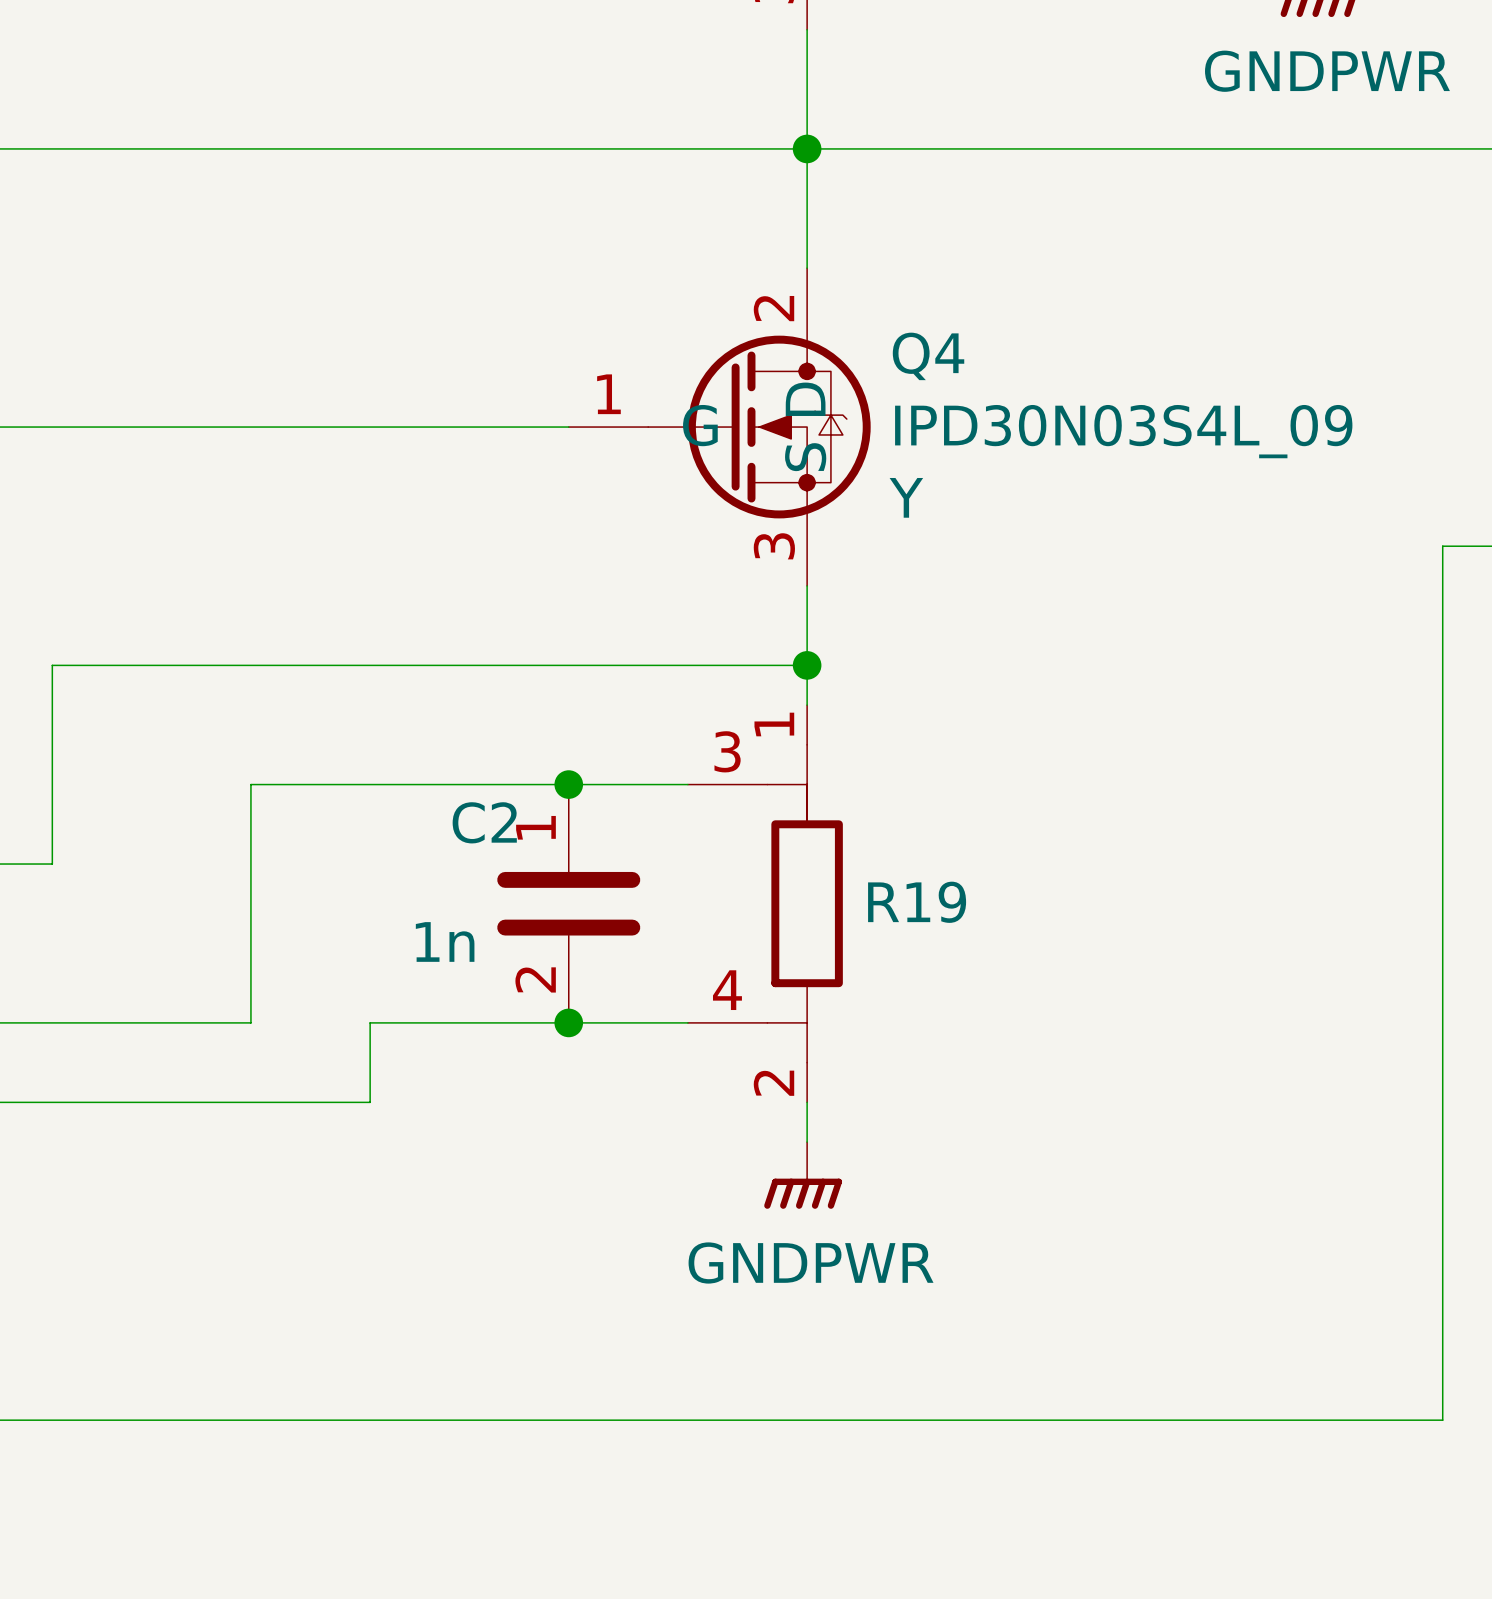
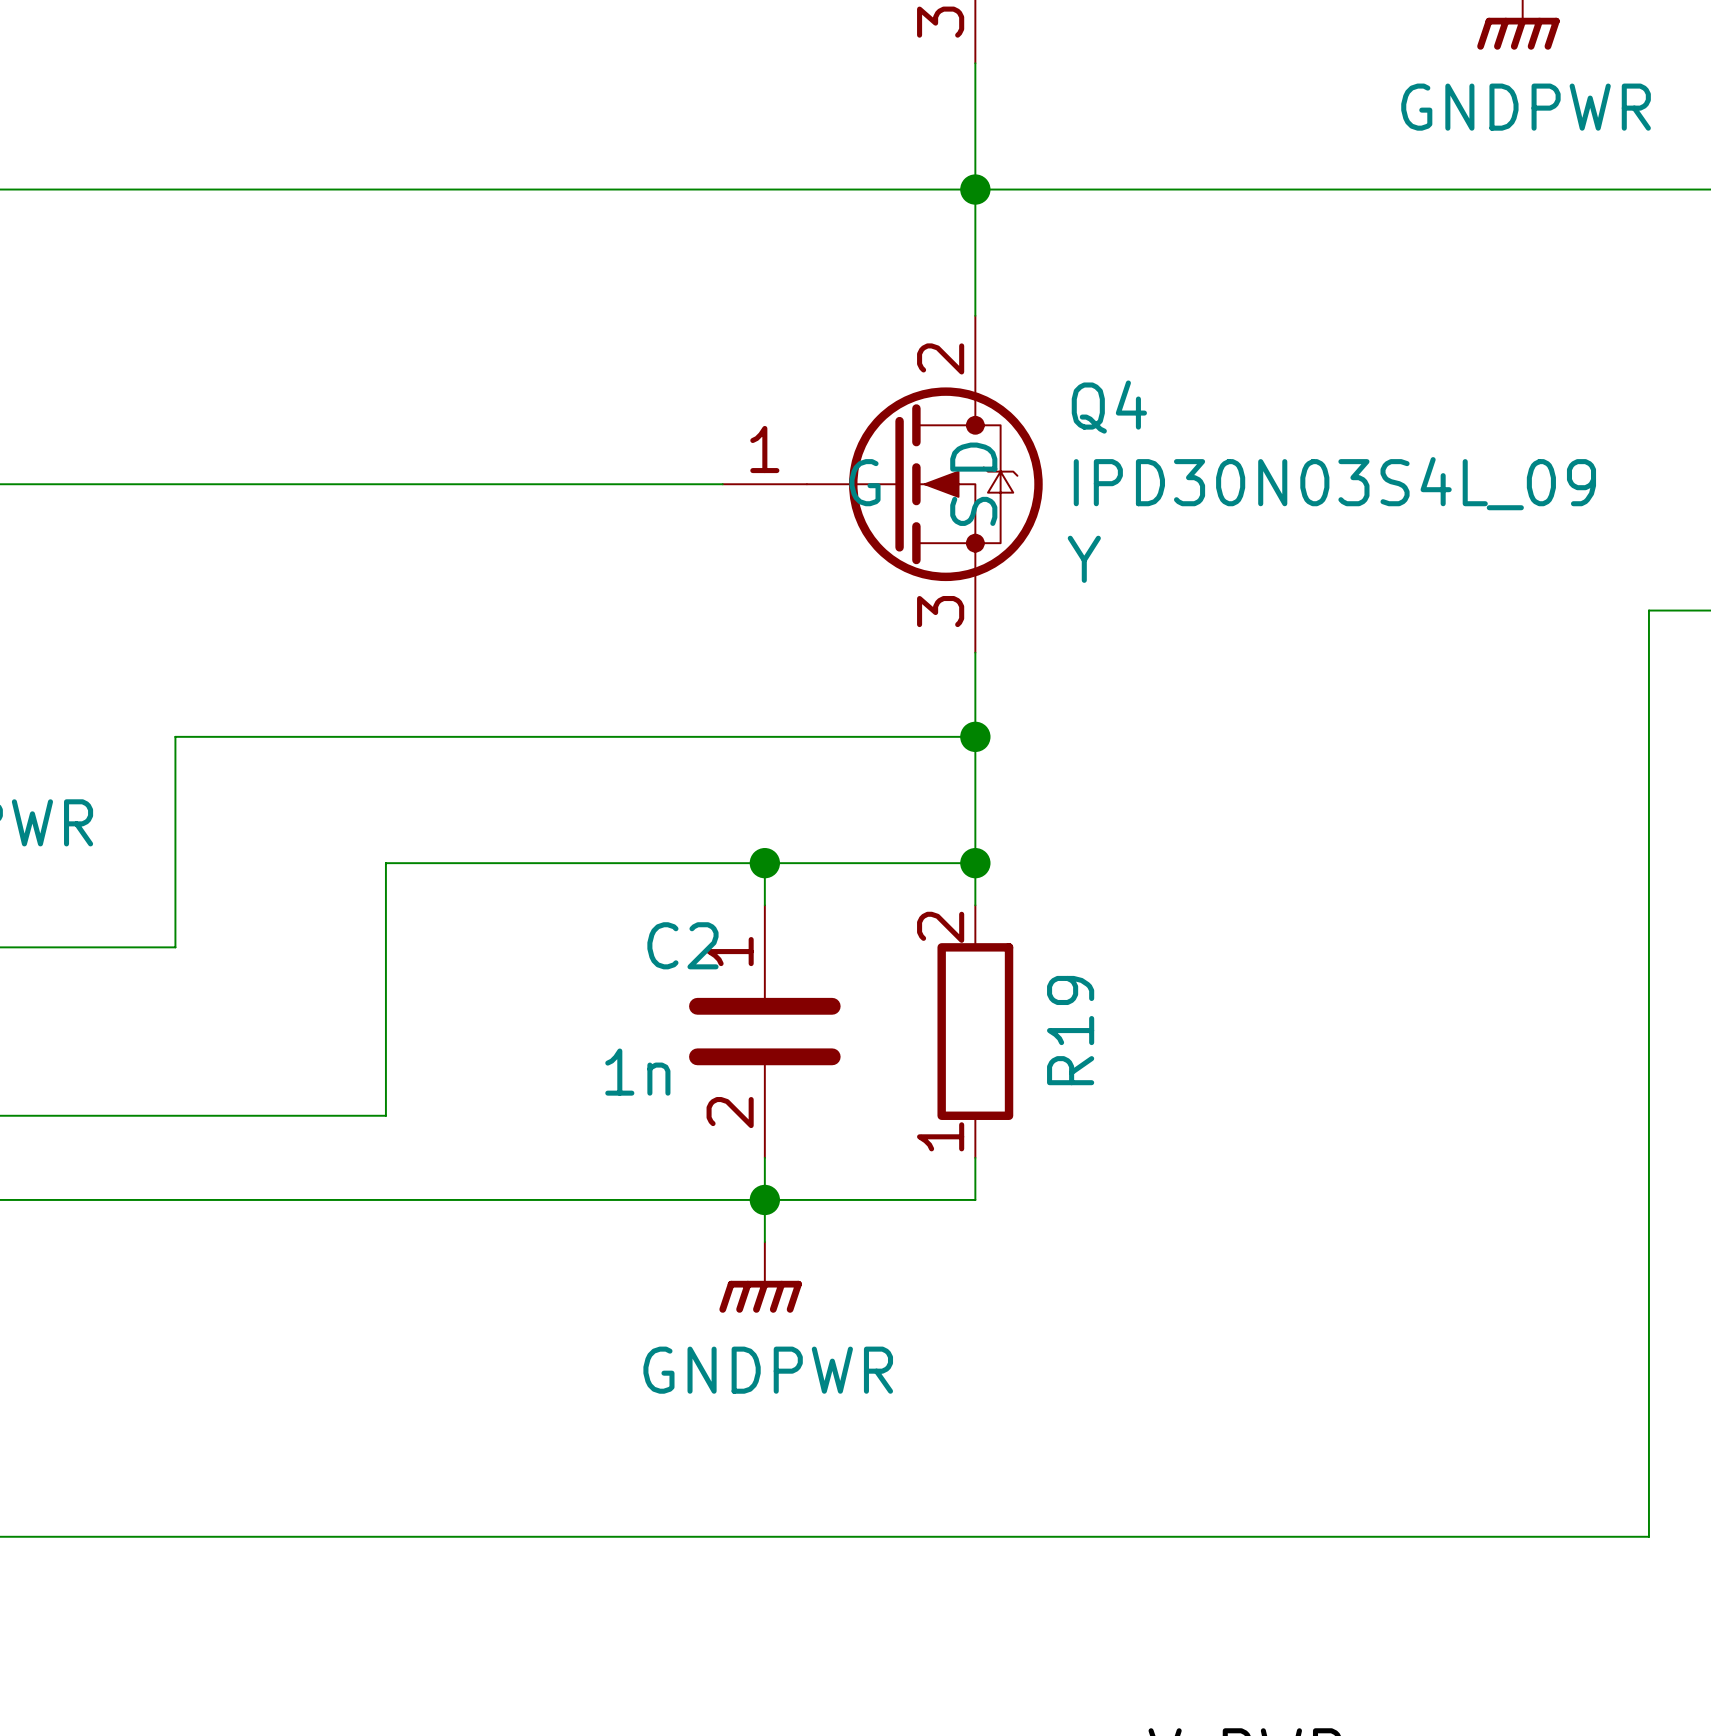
R19 symbol: [687, 705, 843, 1103] -> [937, 905, 1014, 1158]
junction position: (568, 784) -> (764, 863)
junction: none -> (975, 863)
R19 name position: R19 (917, 902) -> R19 (1070, 1030)
C2 position: (568, 903) -> (764, 1031)
junction position: (568, 1022) -> (764, 1199)
wire: (687, 1022) (370, 1022) (370, 1102) -> (975, 1157) (975, 1199) (512, 1199)
wire: none -> (764, 1157) (764, 1242)
wire: (807, 1102) (807, 1142) -> (764, 863) (764, 905)
power symbol position: GNDPWR (803, 1175) -> GNDPWR (760, 1277)

